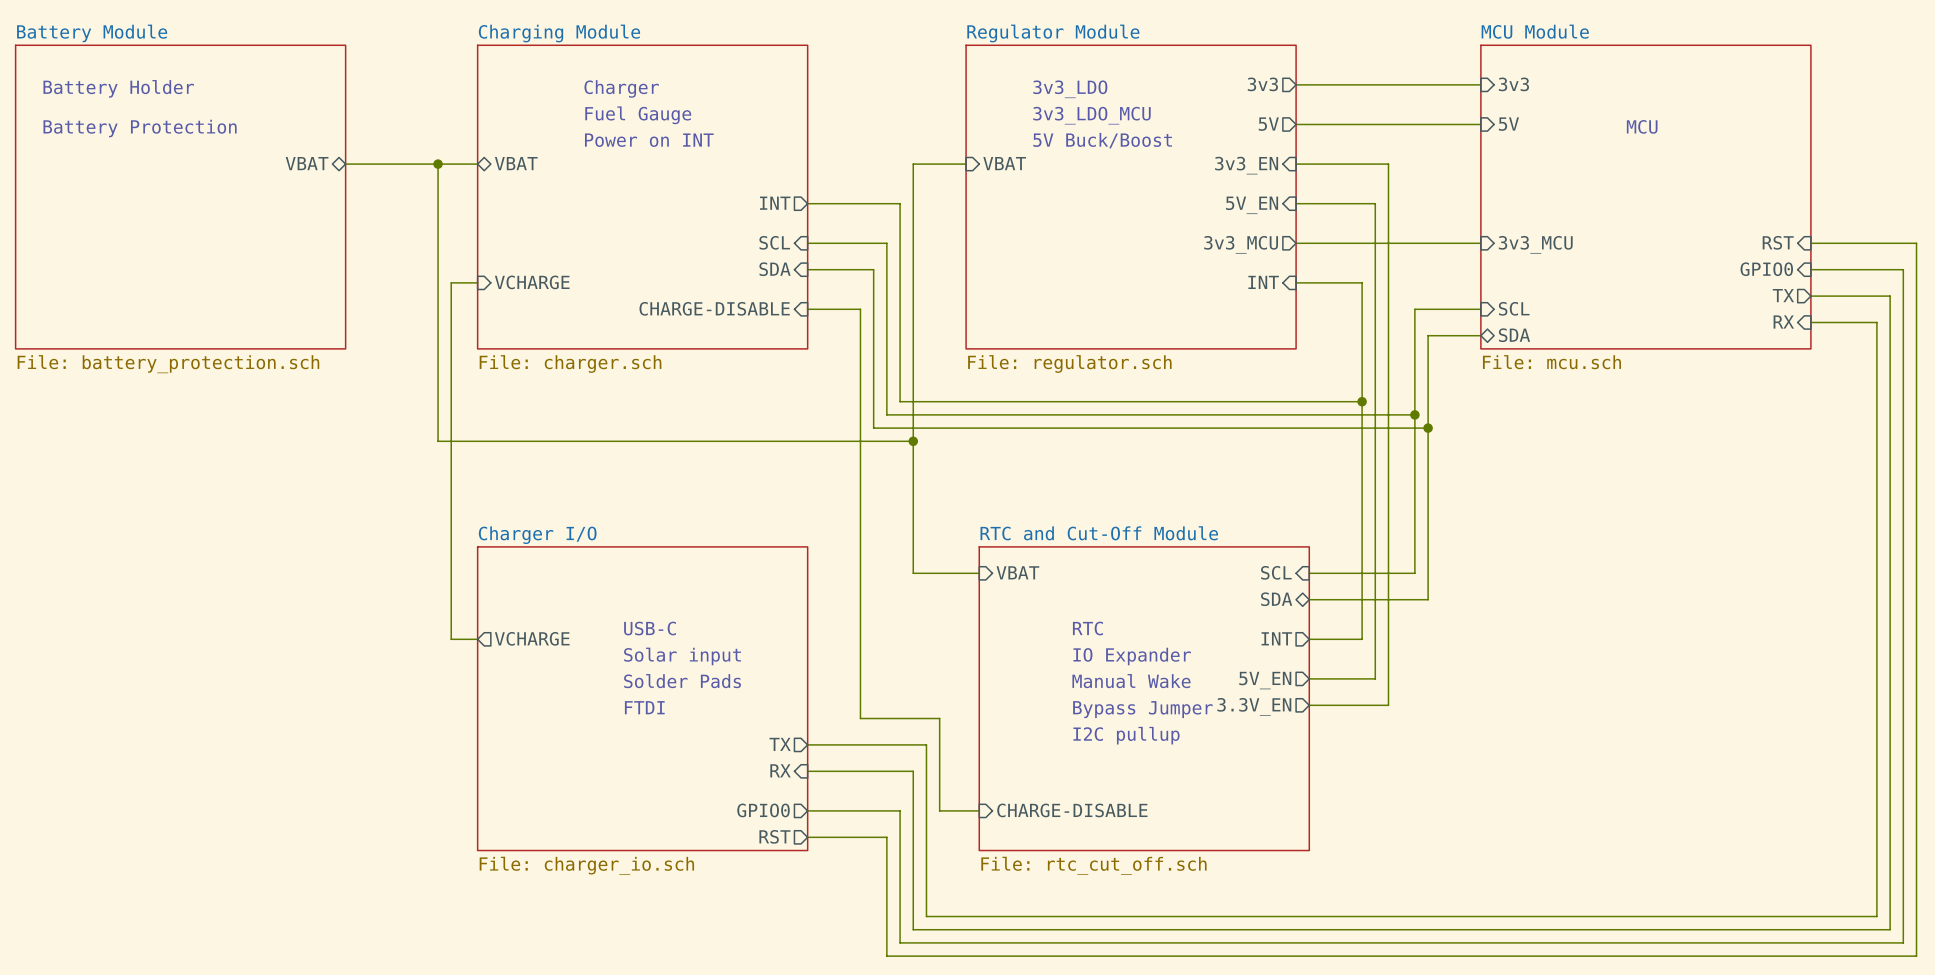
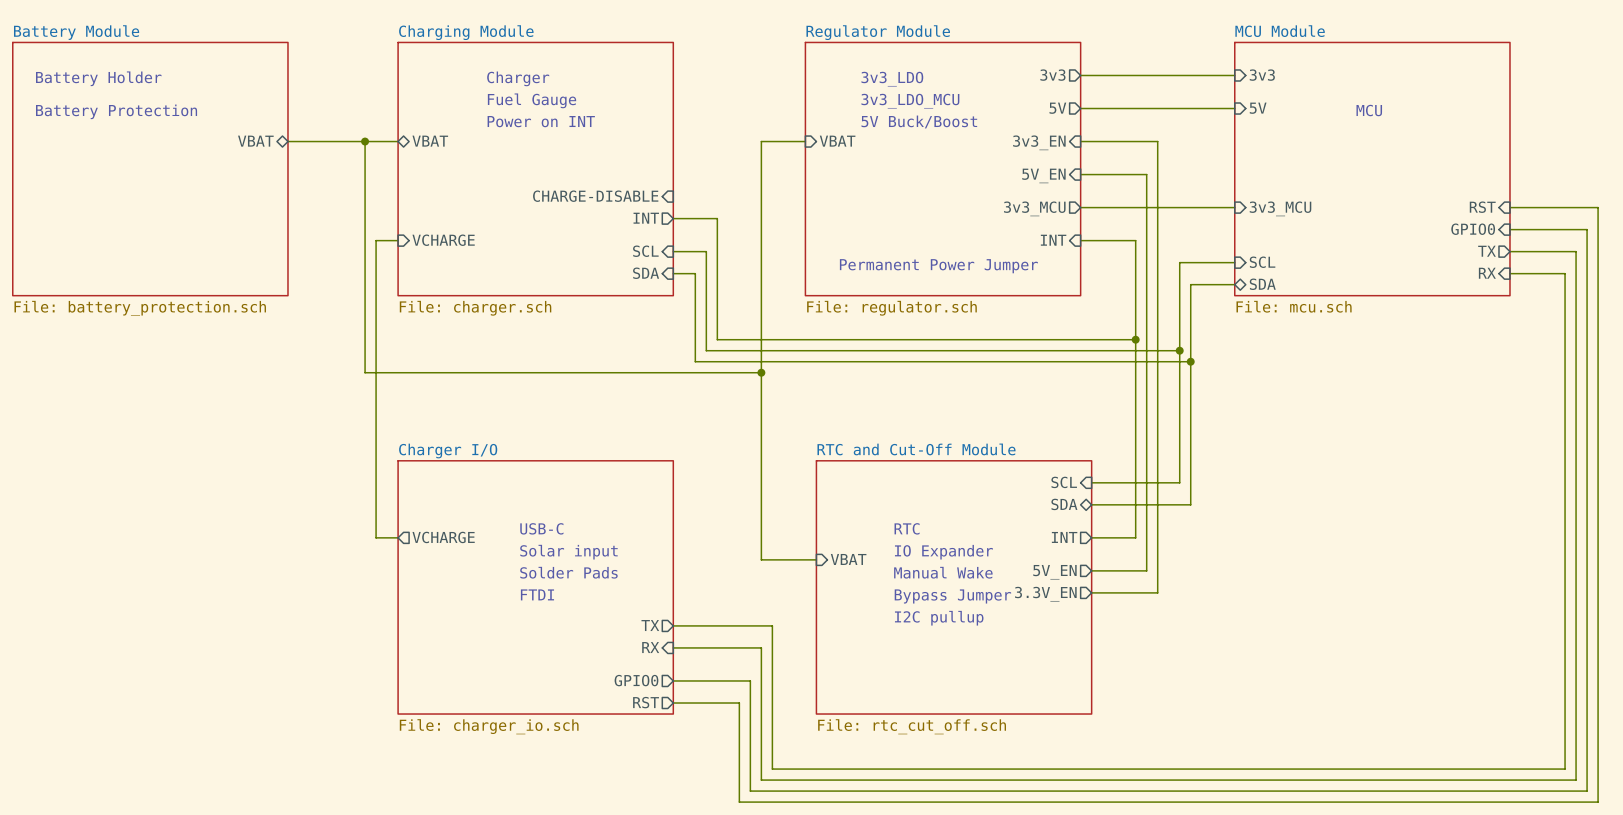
sheet pin position: INT (775, 203) -> INT (646, 218)
wire: (807, 203) (900, 203) (900, 401) -> (717, 339) (750, 339)
sheet pin position: SCL (774, 242) -> SCL (645, 251)
wire: (807, 243) (886, 243) (886, 414) -> (673, 251) (706, 251) (706, 350) (739, 350)
sheet pin position: SDA (774, 269) -> SDA (646, 273)
wire: (807, 269) (873, 269) (873, 428) -> (673, 273) (695, 273) (695, 361) (728, 361)
sheet pin position: CHARGE-DISABLE (714, 308) -> CHARGE-DISABLE (595, 196)
wire: (807, 309) (860, 309) -> (673, 218) (717, 218) (717, 262)
text: none -> Permanent Power Jumper (938, 266)
wire: (860, 401) (860, 718) (939, 718) (939, 810) (979, 810) -> none
sheet pin position: VBAT (1017, 572) -> VBAT (848, 559)
wire: (913, 573) (979, 573) -> (761, 482) (761, 559) (816, 559)
sheet pin: CHARGE-DISABLE (1072, 810) -> none

